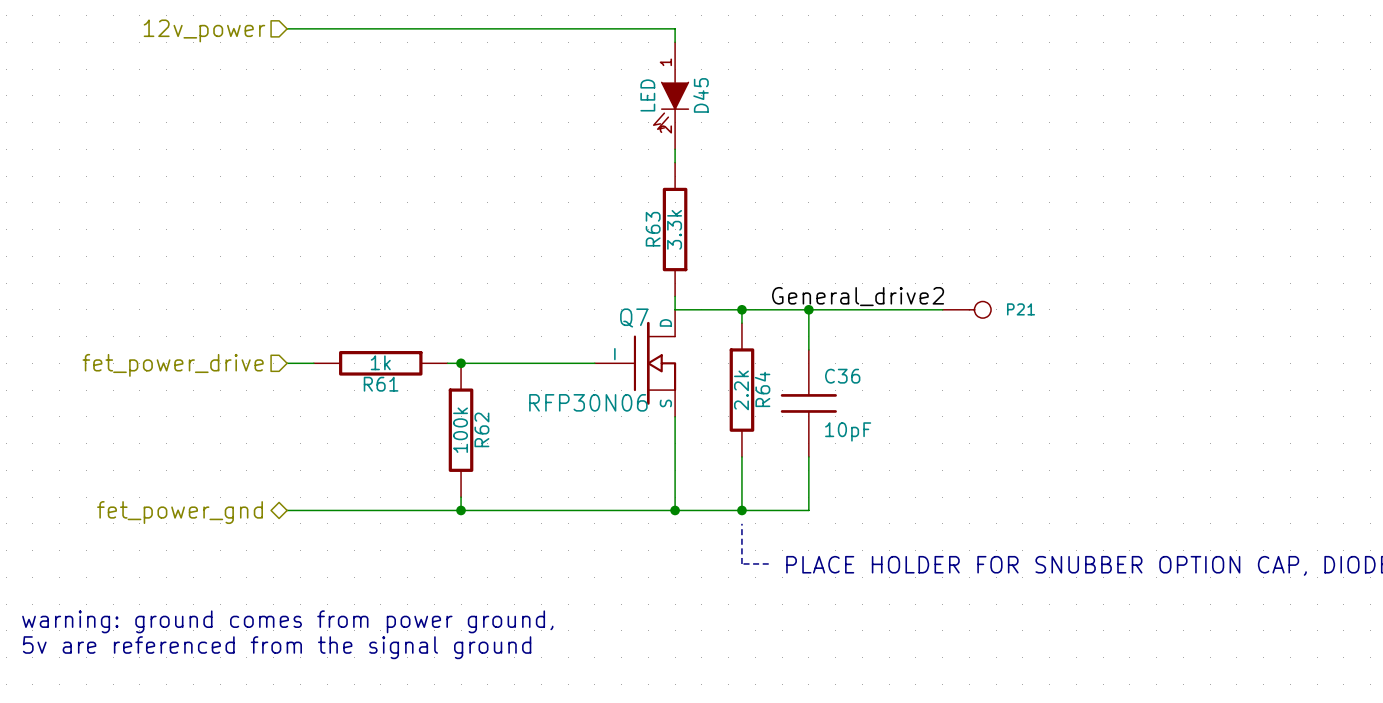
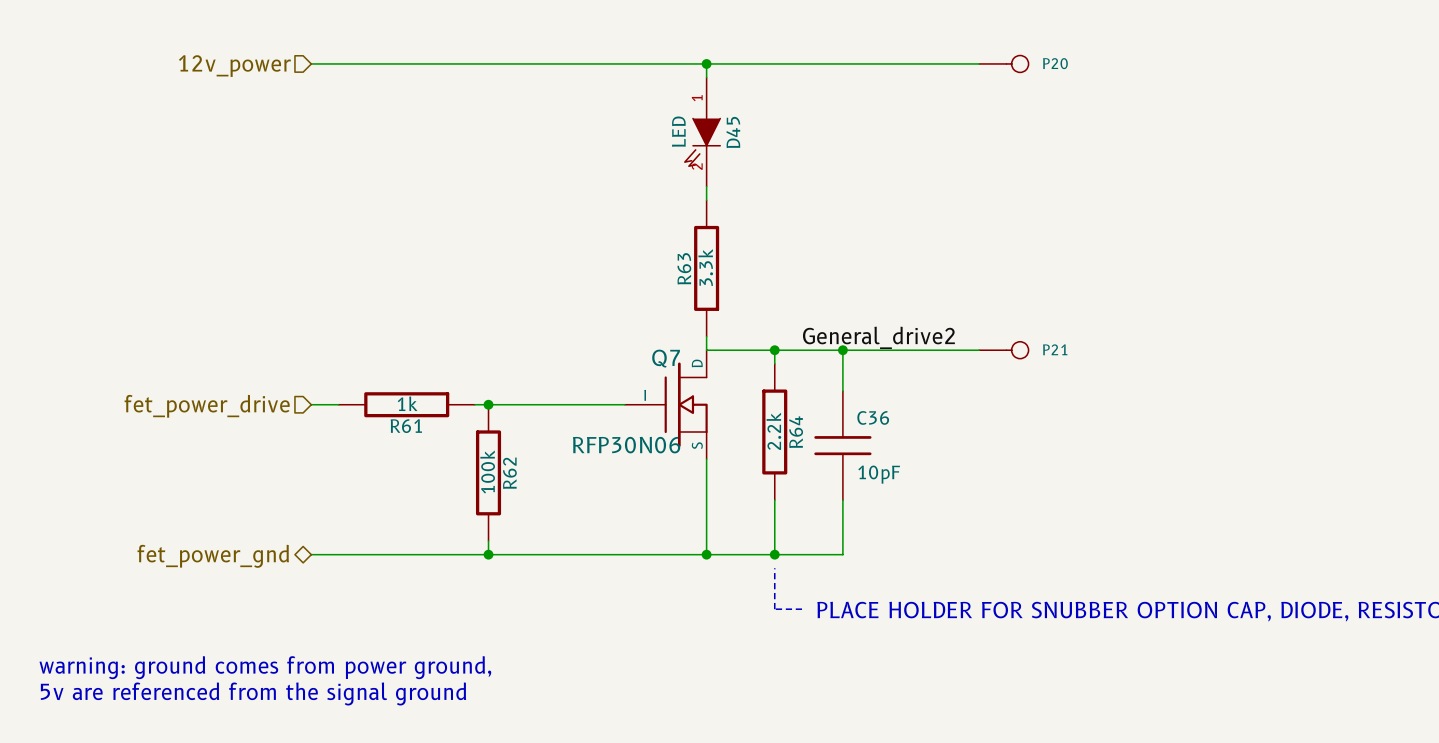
wire: none -> (706, 63) (979, 63)
junction: none -> (706, 63)
P20: none -> (1003, 63)

